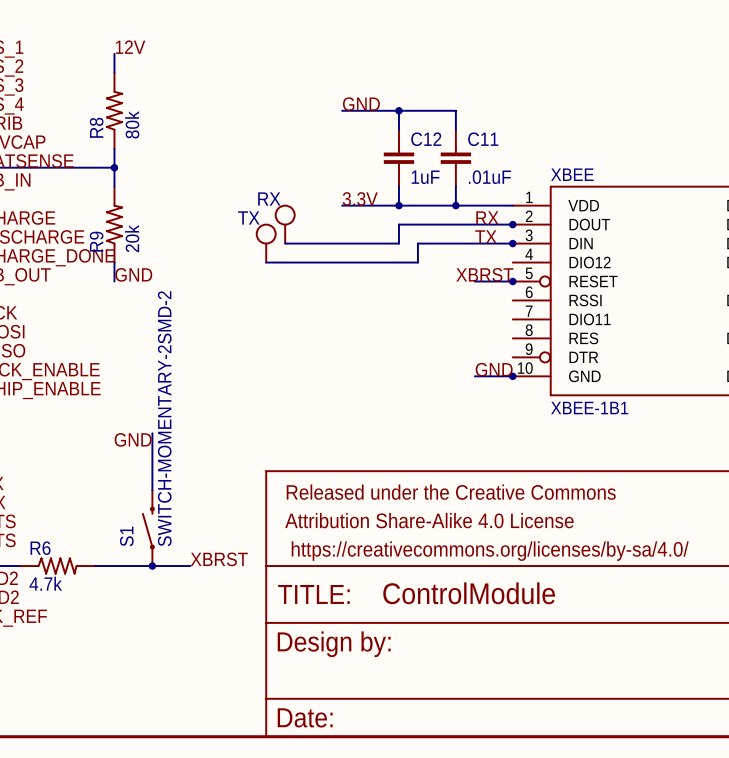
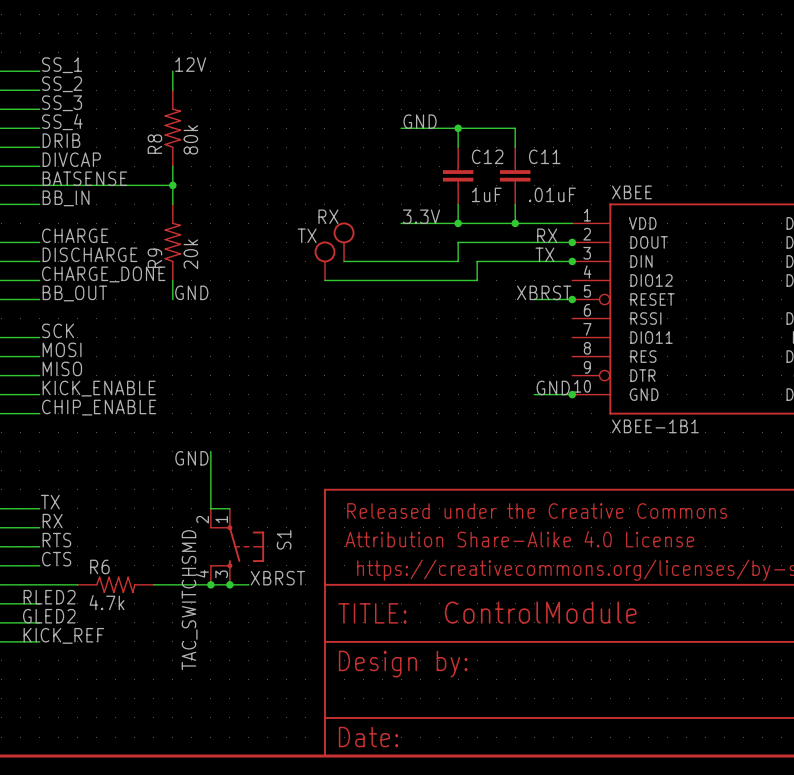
S1 value: SWITCH-MOMENTARY-2SMD-2 (164, 418) -> TAC_SWITCHSMD (189, 600)
S1 symbol: [141, 490, 155, 567] -> [210, 508, 265, 585]
wire: none -> (210, 508) (229, 508)
S1 name position: S1 (126, 536) -> S1 (284, 539)
junction: none -> (229, 584)

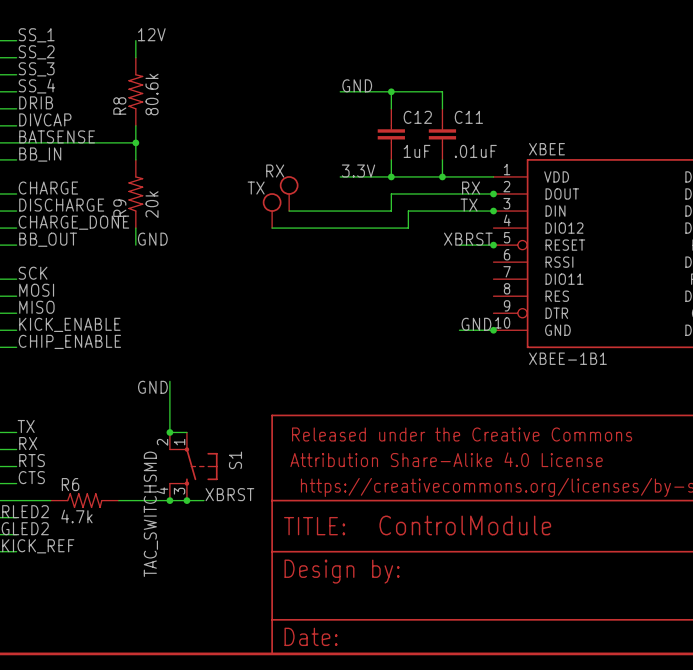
R8 value: 80k (190, 139) -> 80.6k (152, 94)
junction: none -> (169, 432)

